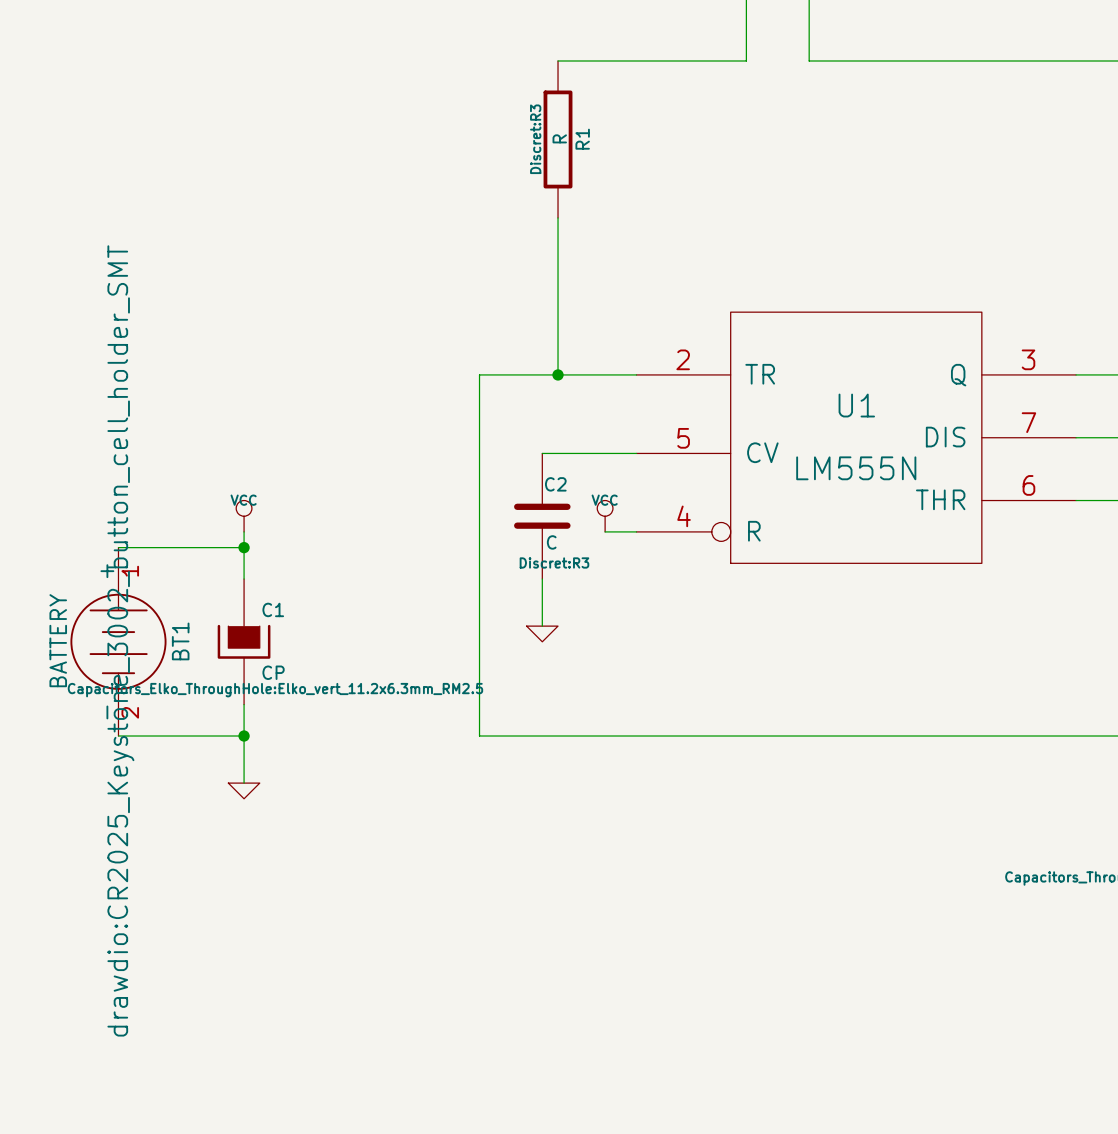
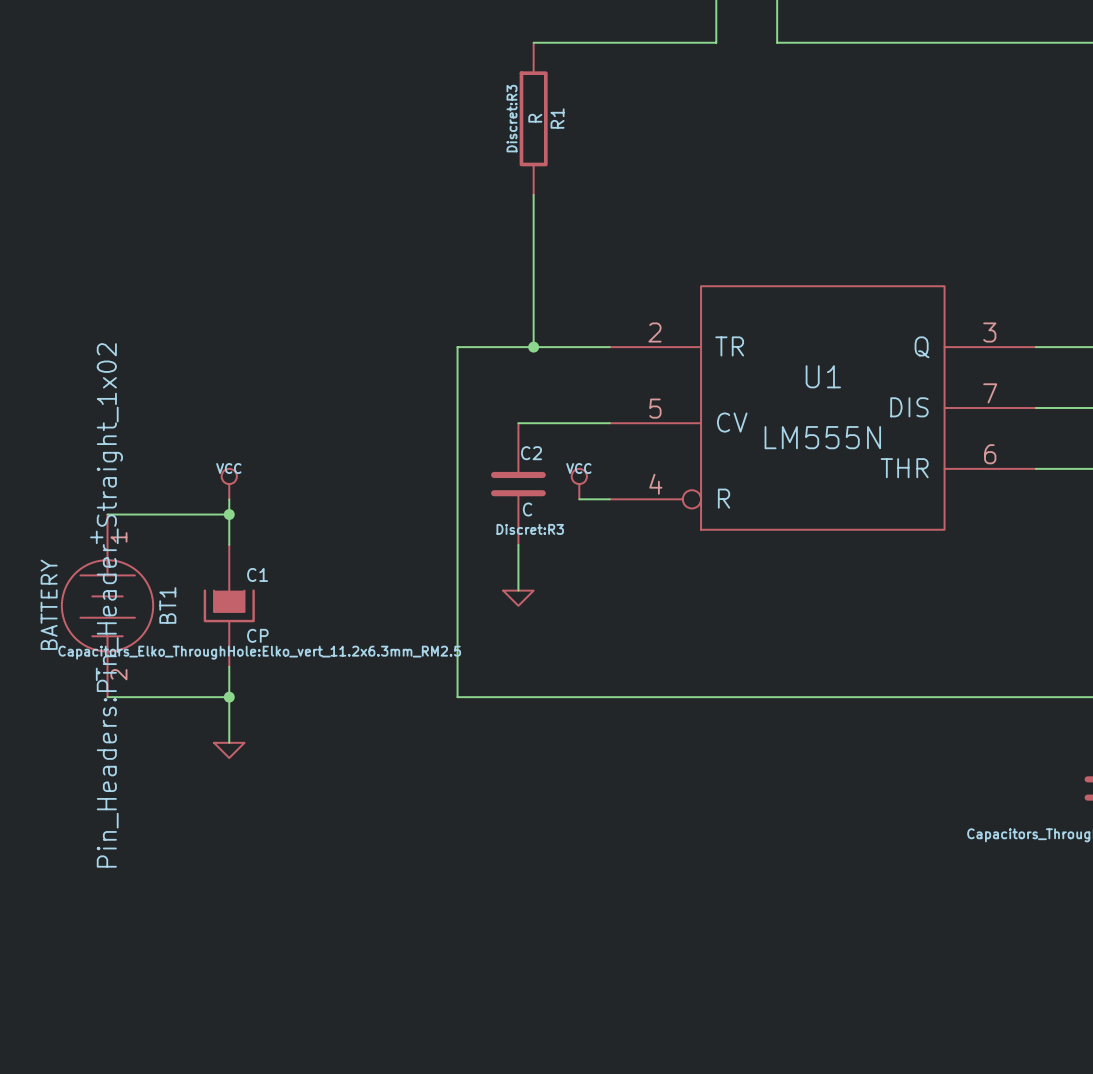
BT1 text: drawdio:CR2025_Keystone_3002_button_cell_holder_SMT (120, 640) -> Pin_Headers:Pin_Header_Straight_1x02 (109, 605)

